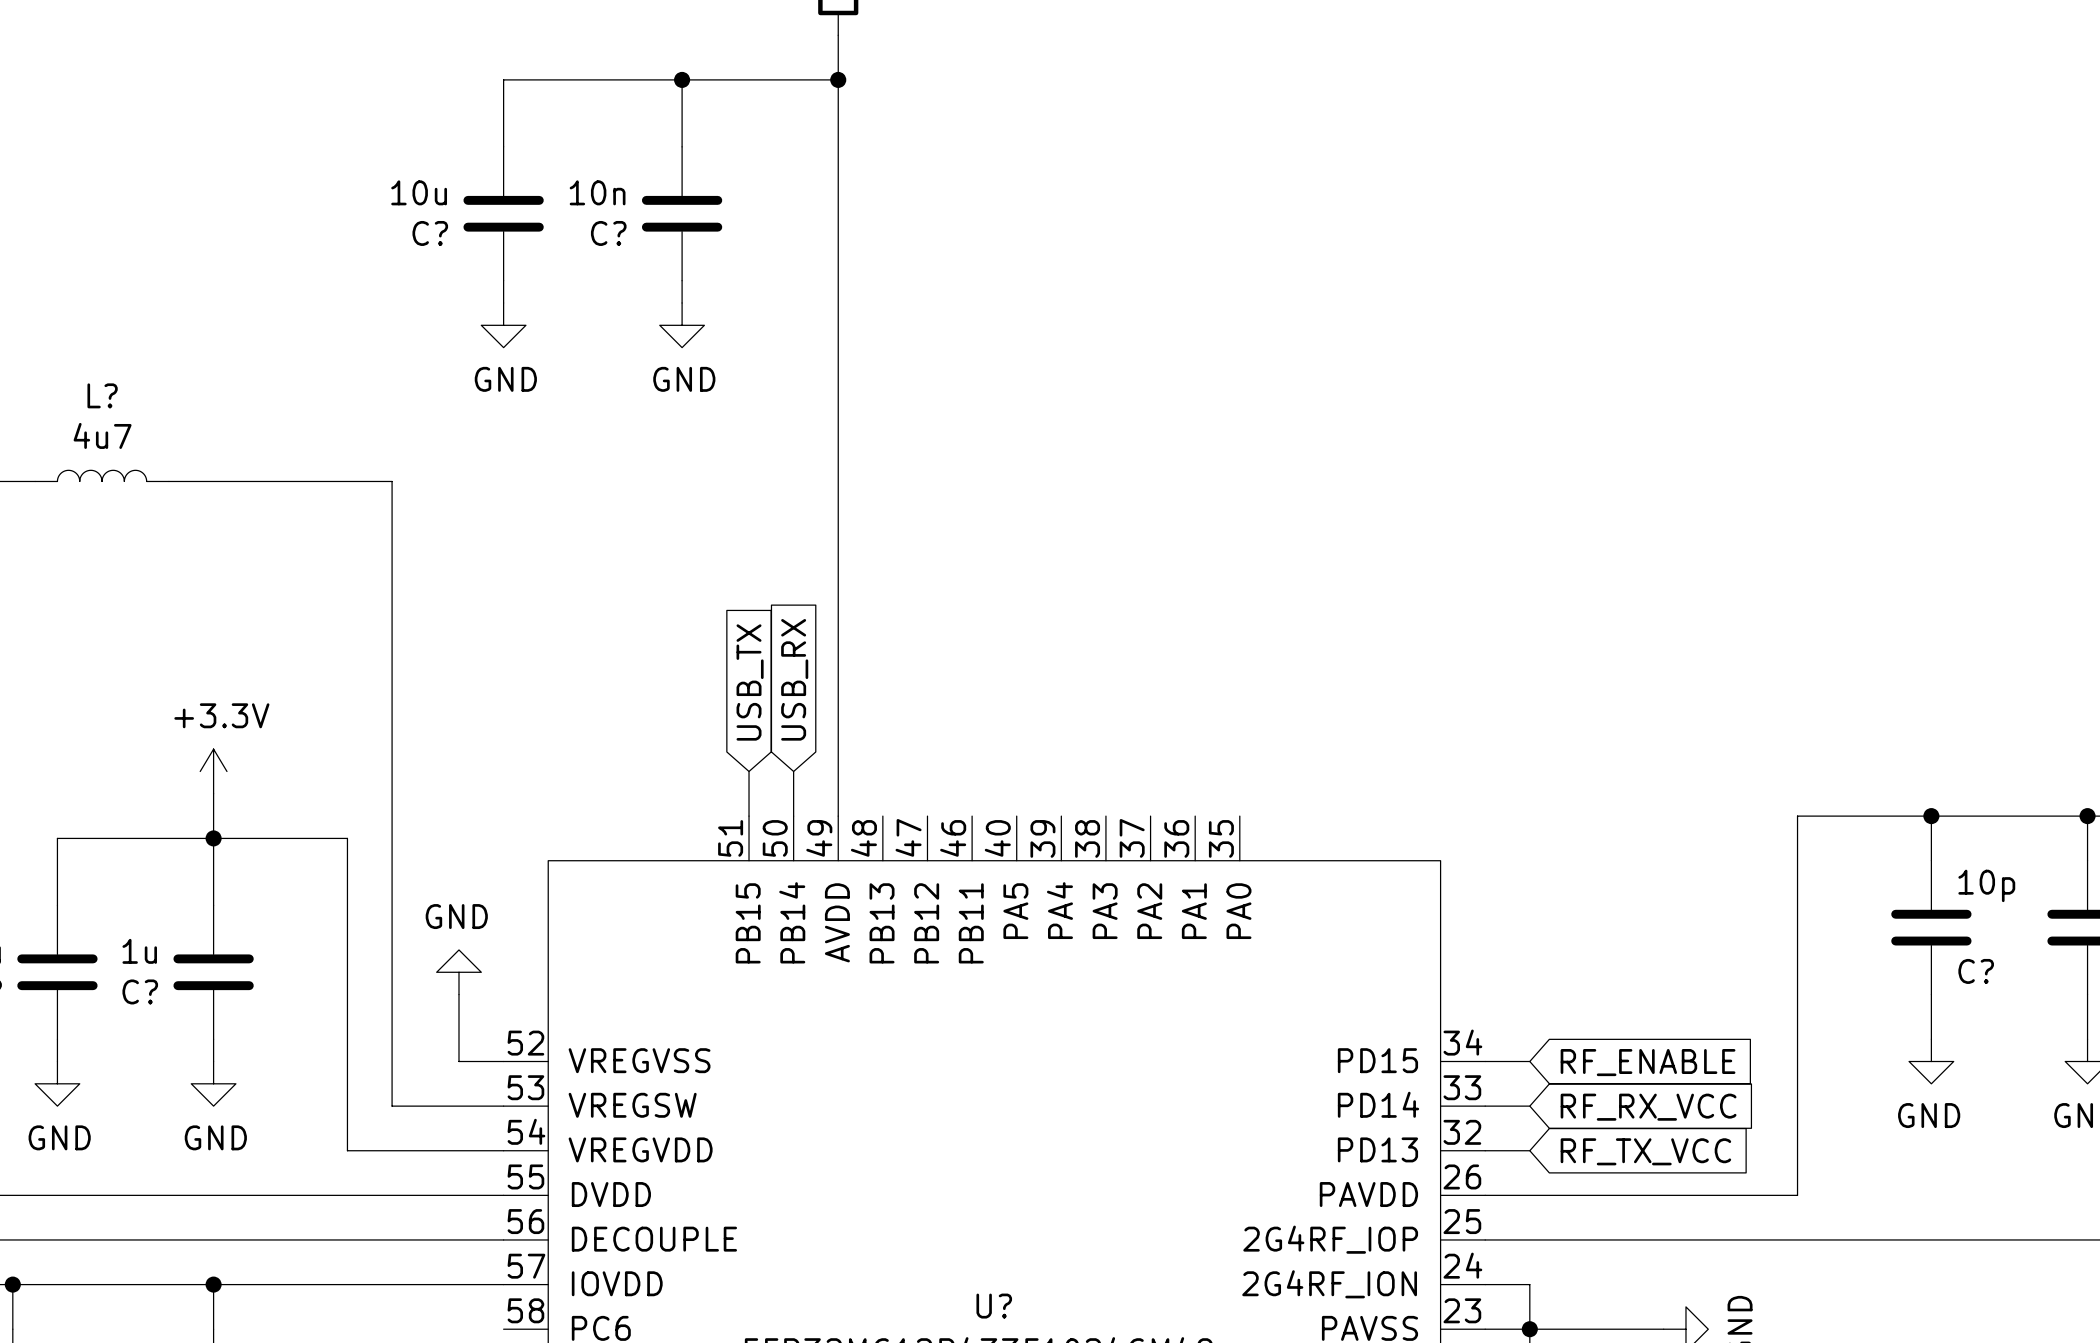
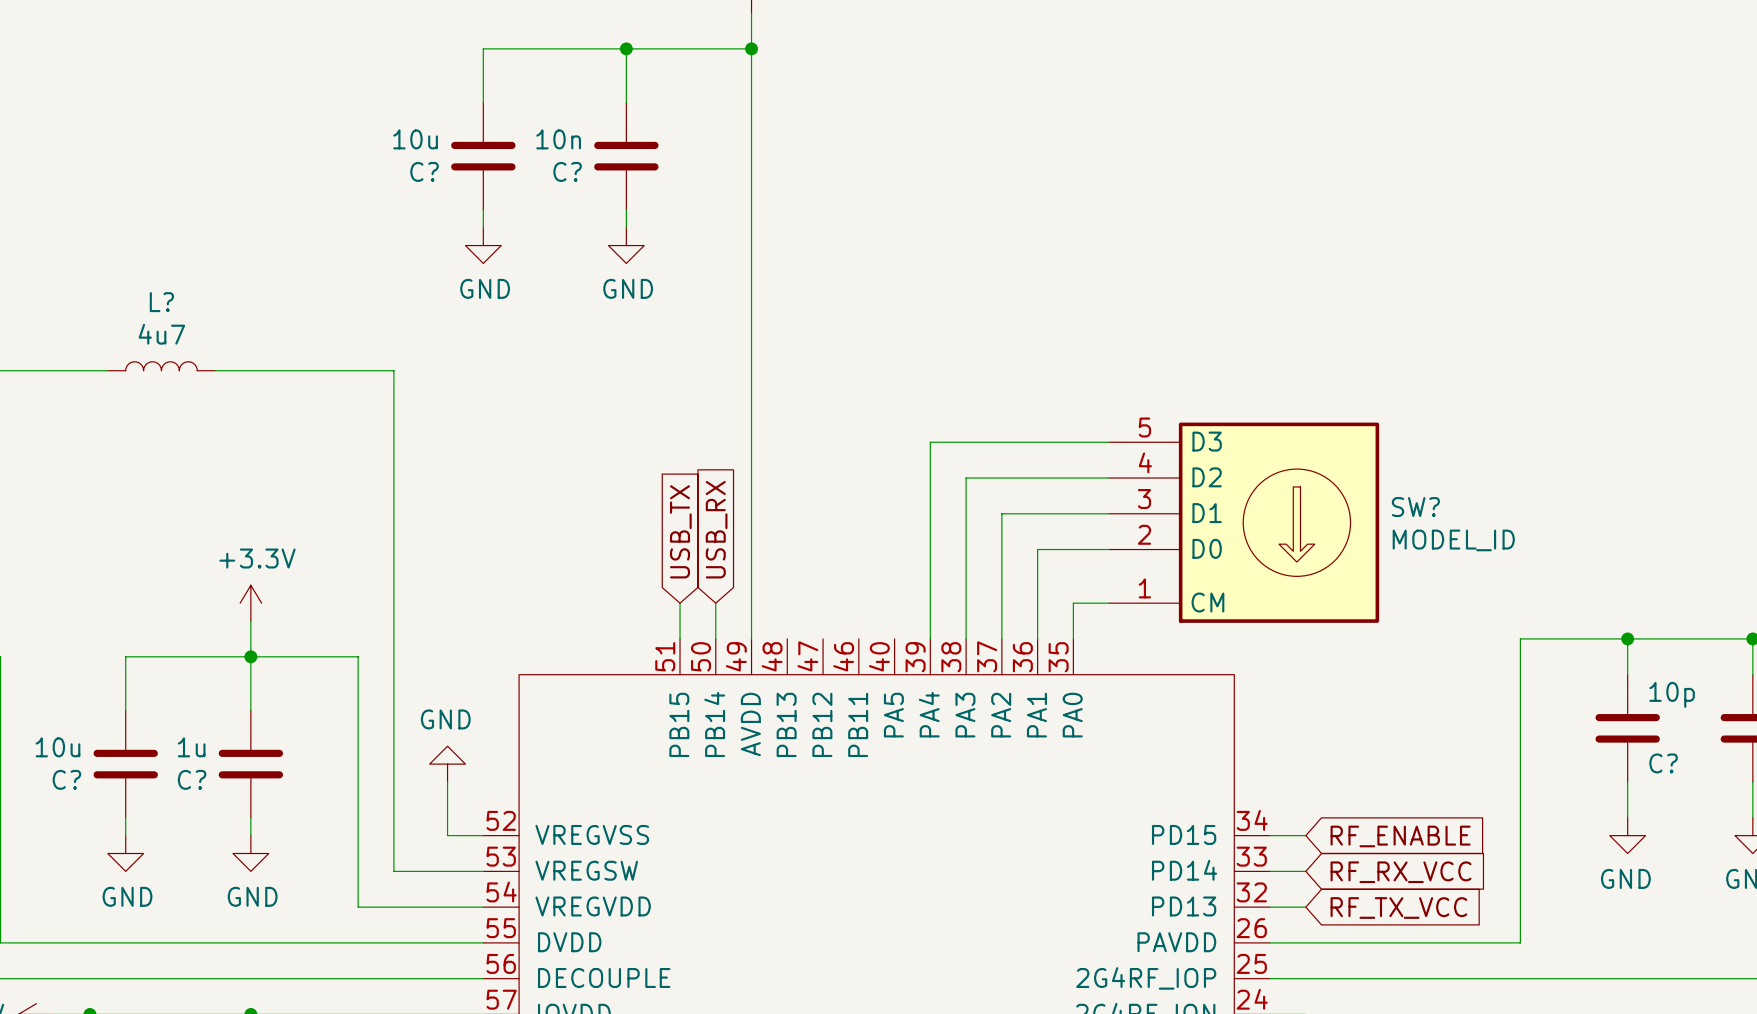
wire: none -> (1109, 442) (930, 442) (930, 638)
wire: none -> (1109, 478) (966, 478) (966, 638)
wire: none -> (1109, 513) (1001, 513) (1001, 638)
SW?: none -> MODEL_ID (1244, 522)
wire: none -> (1109, 549) (1037, 549) (1037, 638)
wire: none -> (1109, 603) (1073, 603) (1073, 638)

